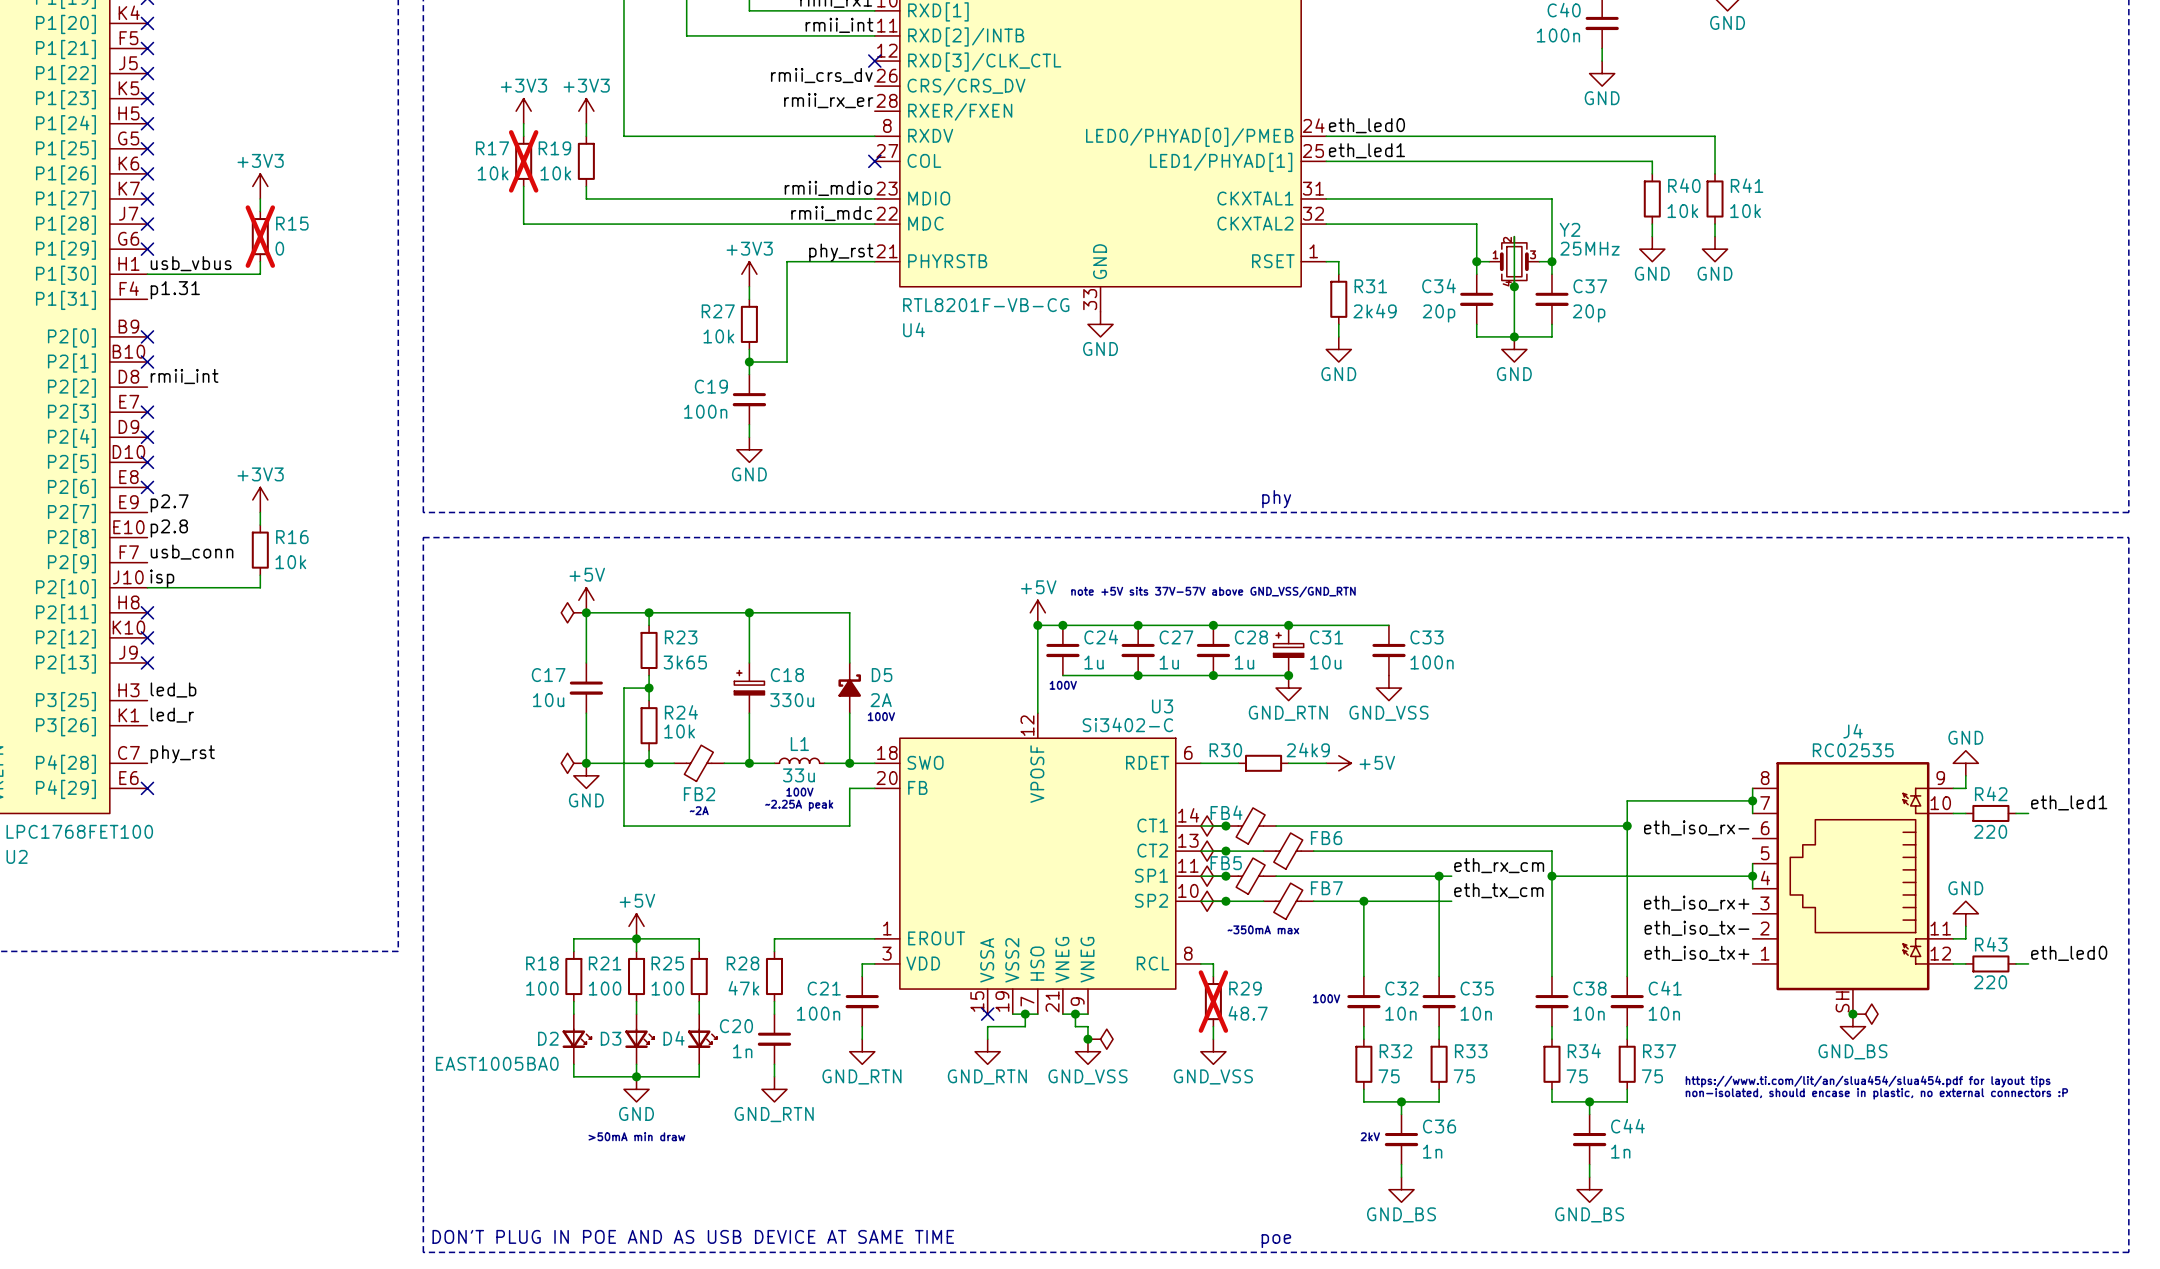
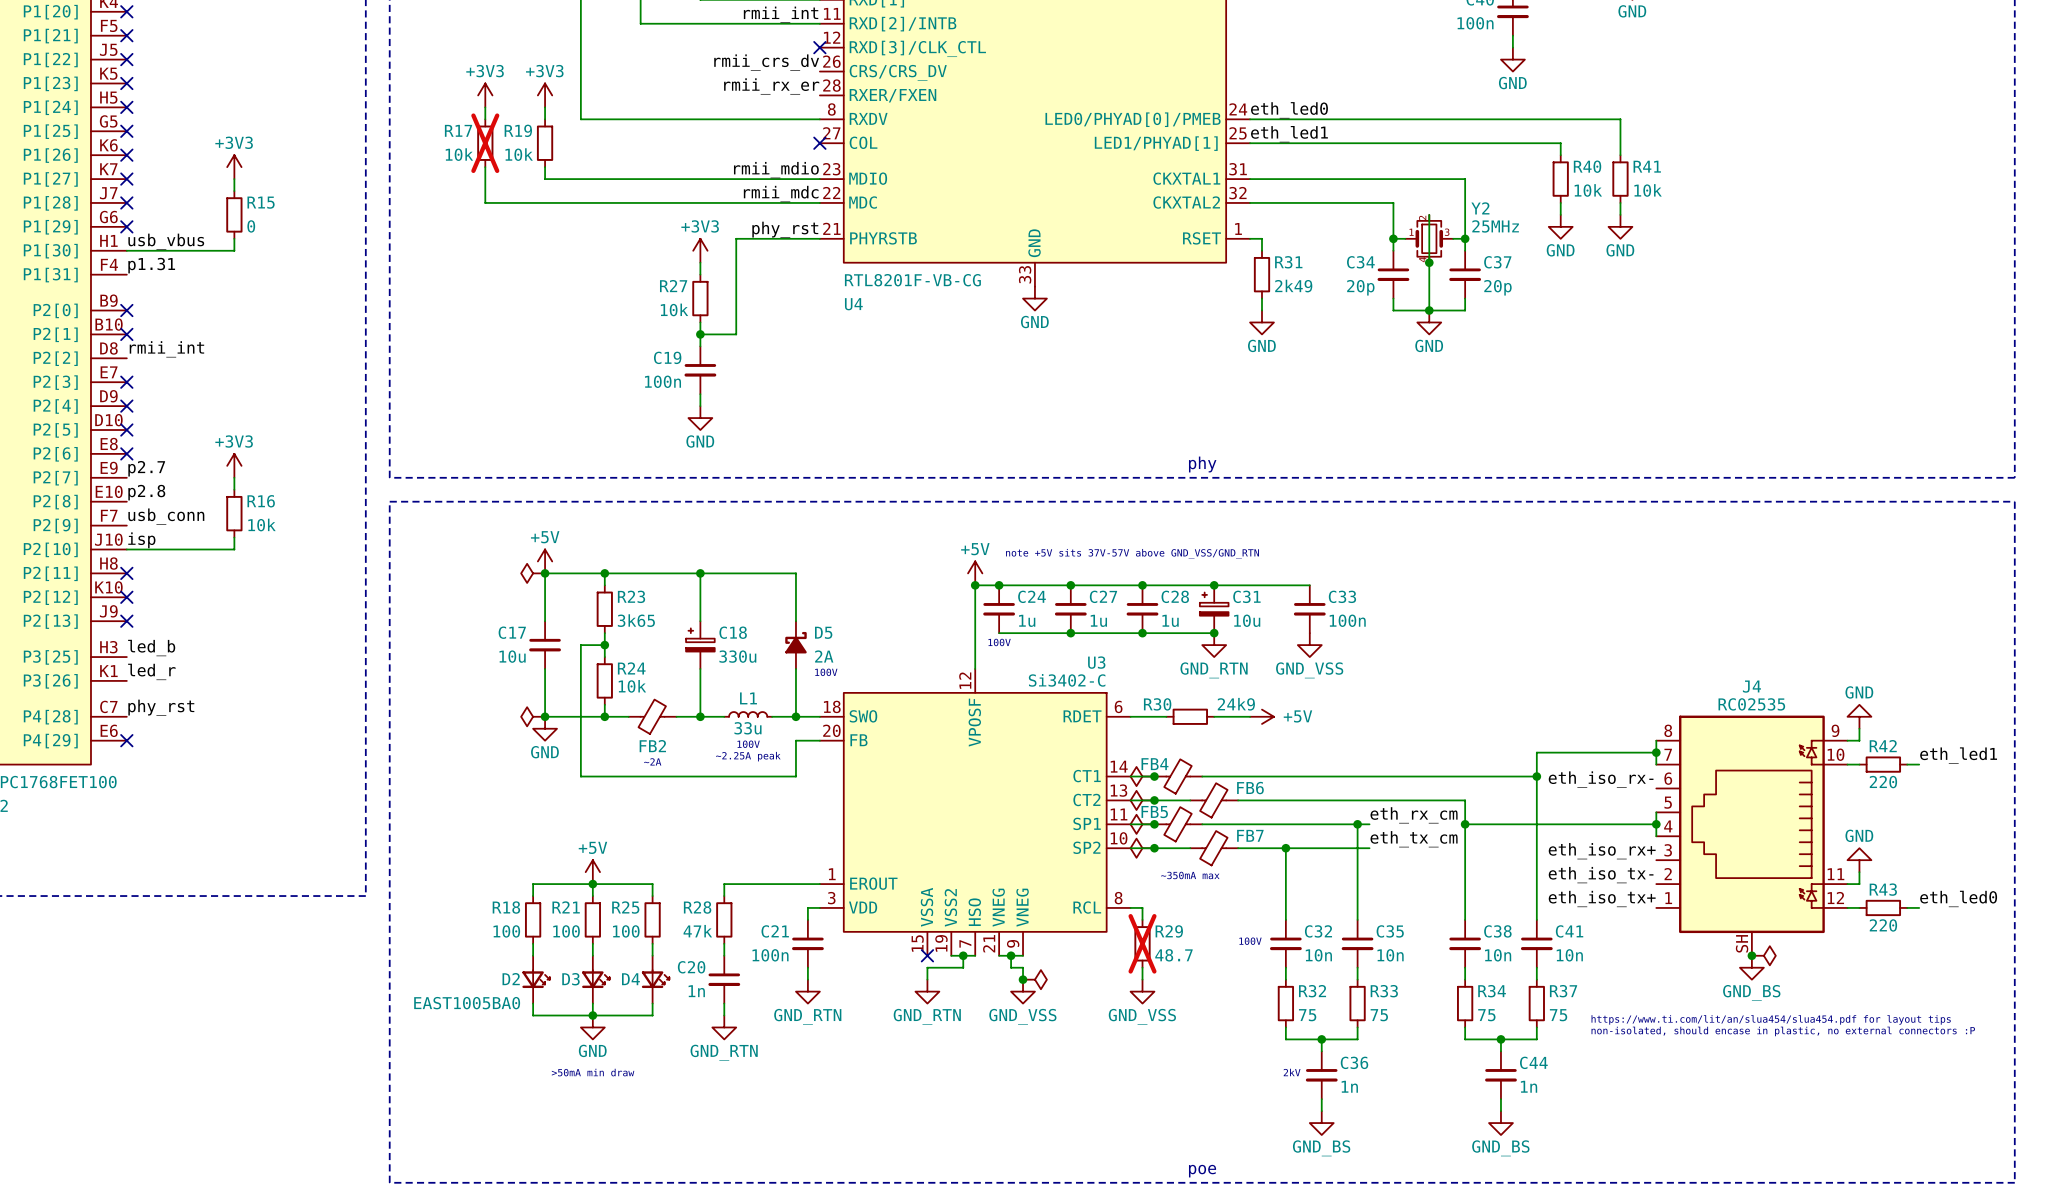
R15 do-not-place cross: (260, 236) -> none
text: DON'T PLUG IN POE AND AS USB DEVICE AT SAME TIME (693, 1236) -> none

